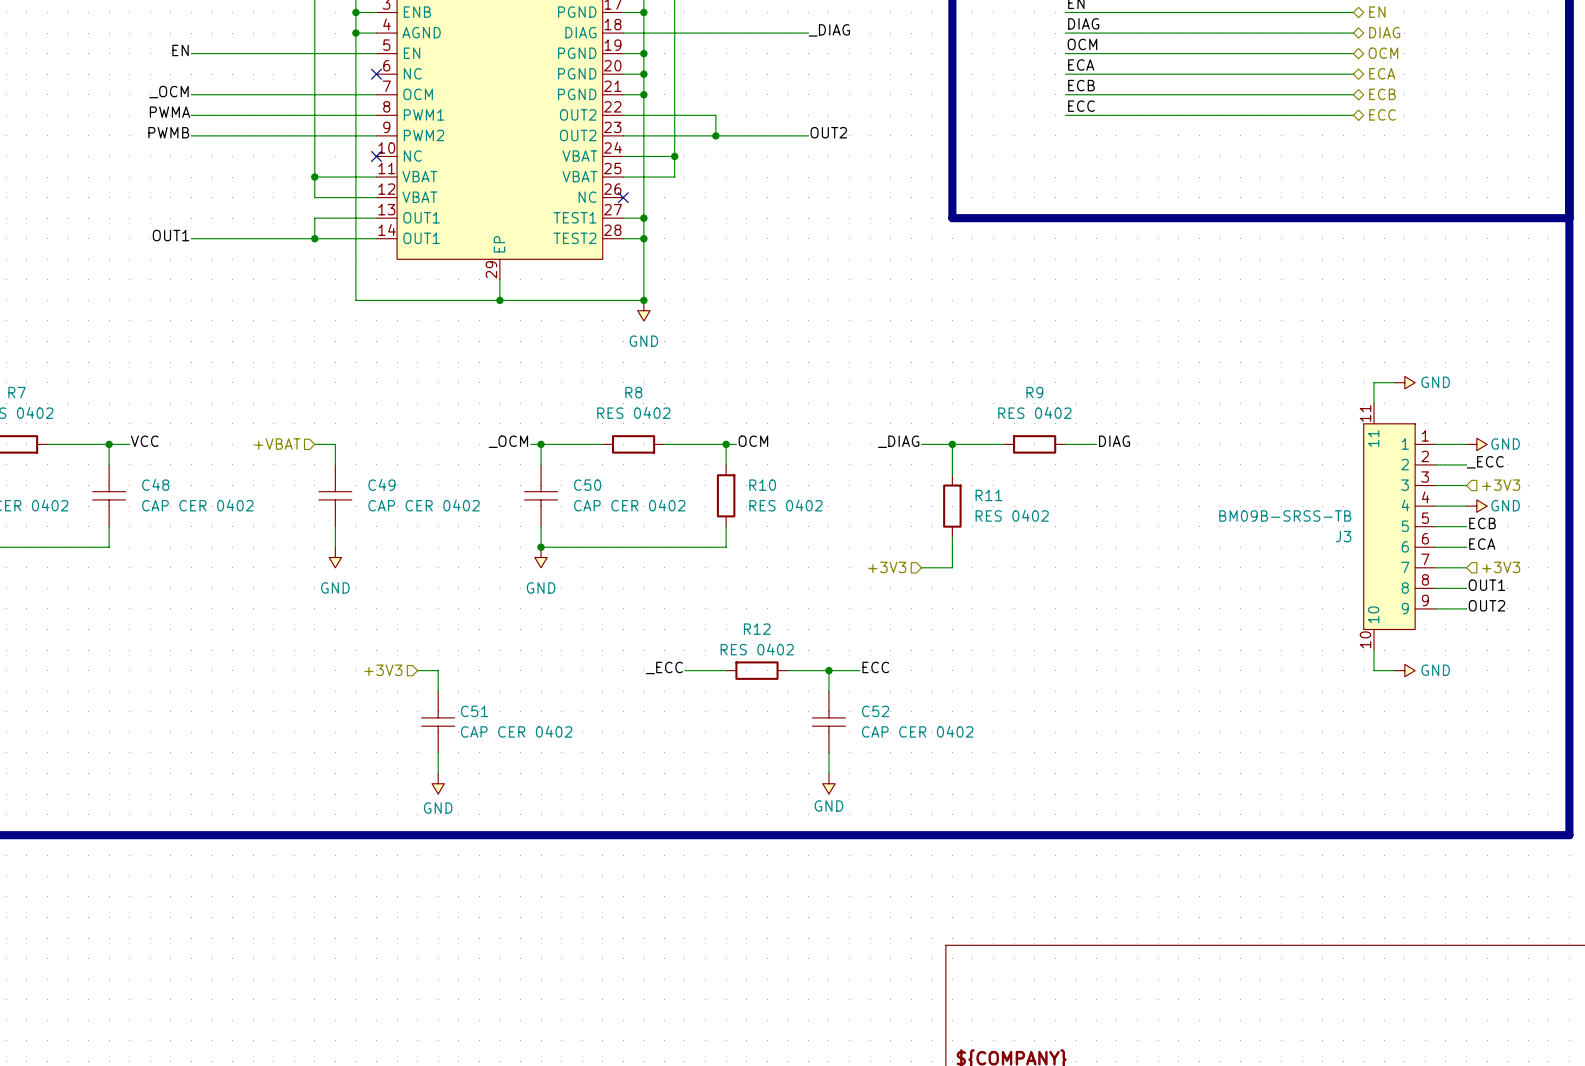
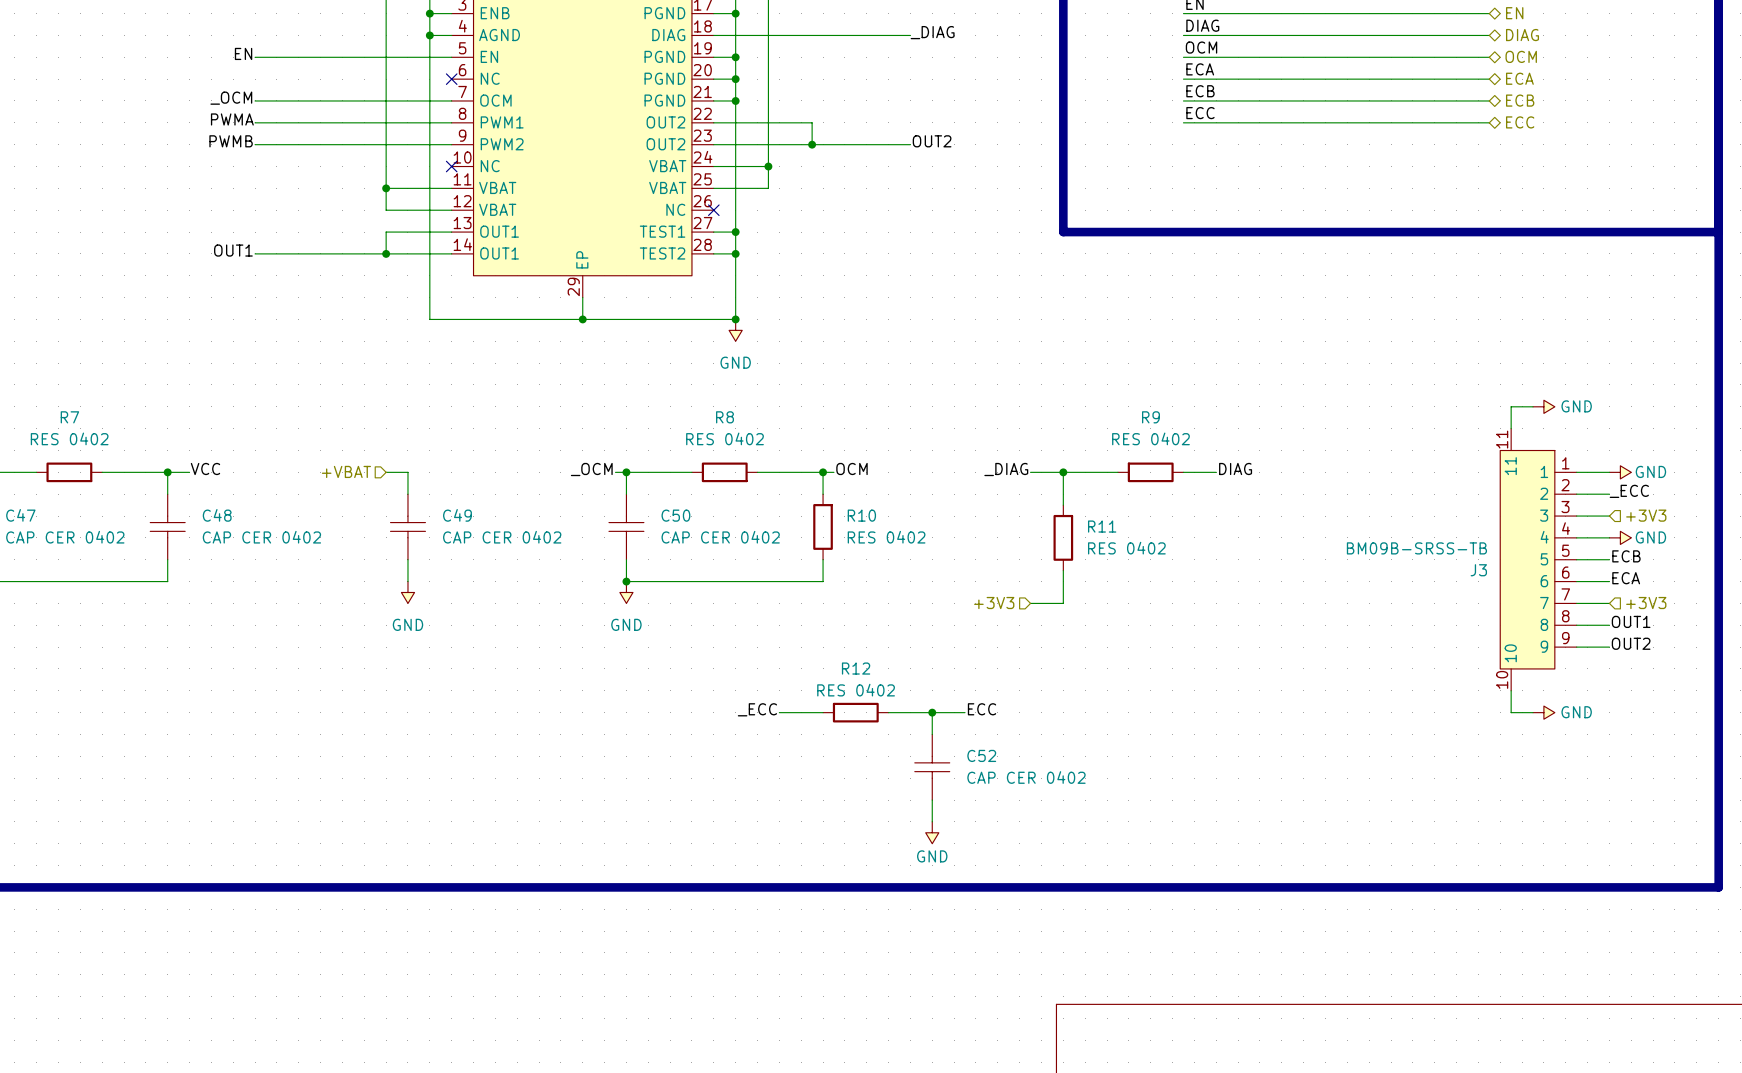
hierarchical label: +3V3 (383, 670) -> none
wire: (417, 670) (438, 670) (438, 691) -> none
C51: CAP CER 0402 (438, 722) -> none
wire: (438, 752) (438, 773) -> none
power symbol: GND (438, 783) -> none

